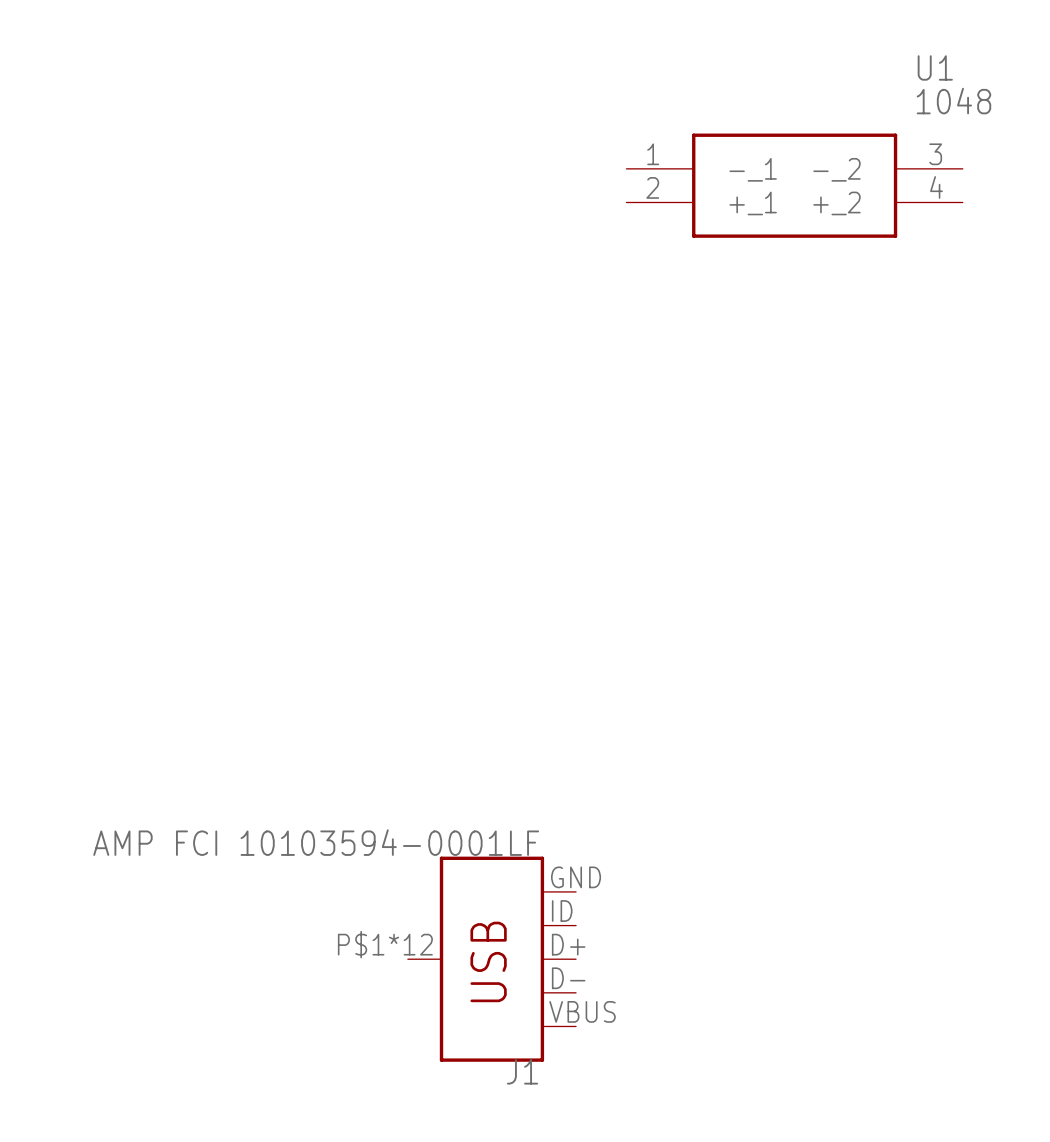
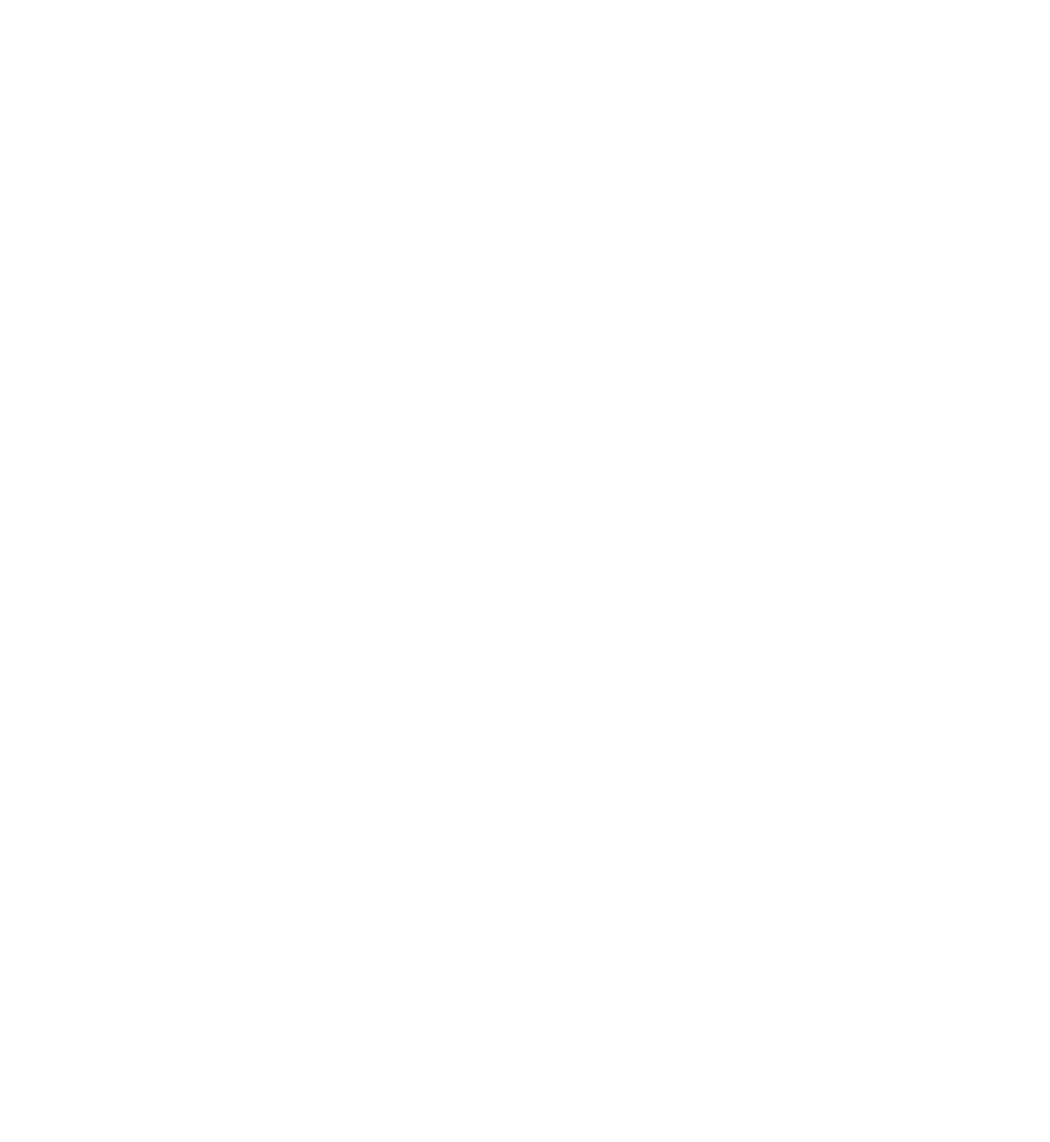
U1: 1048 (794, 185) -> none
J1: AMP FCI 10103594-0001LF (491, 959) -> none

